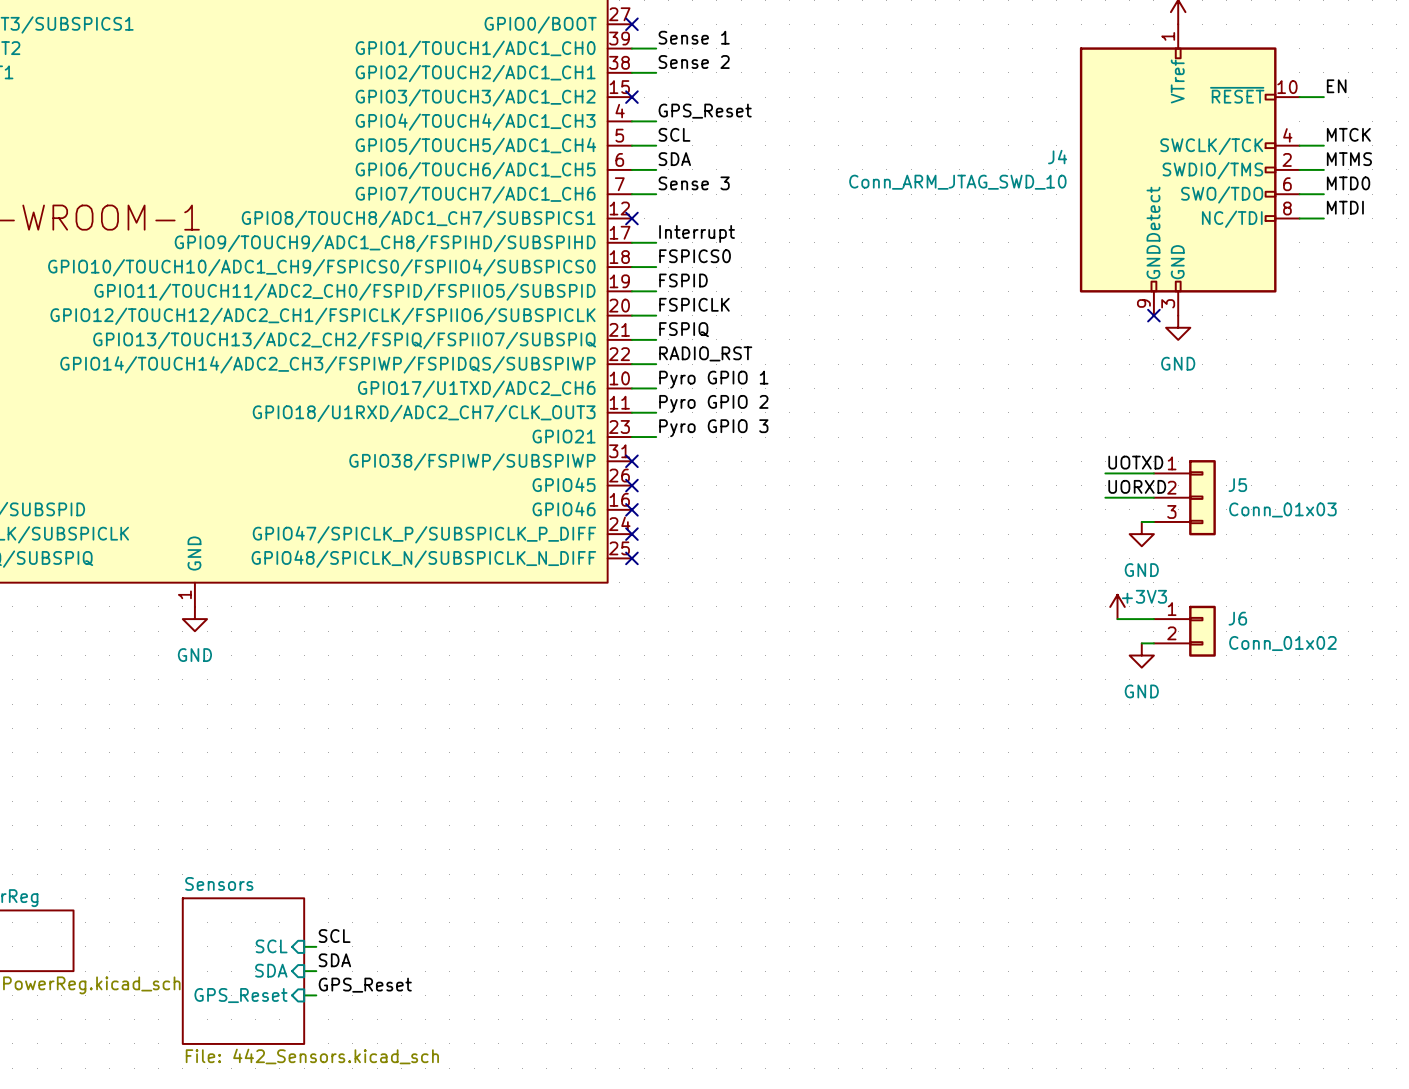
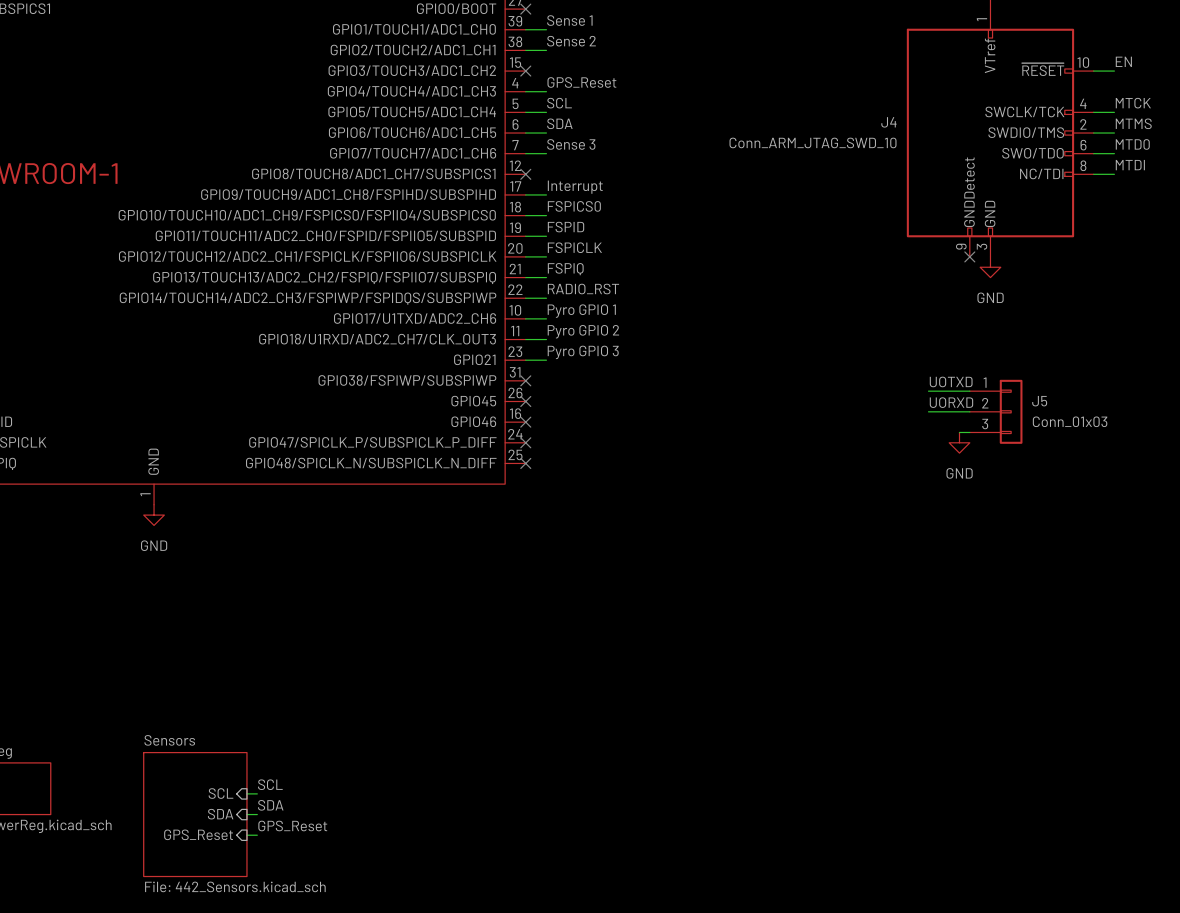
power symbol: +3V3 (1117, 606) -> none
wire: (1117, 619) (1153, 619) -> none
J6: Conn_01x02 (1184, 631) -> none
wire: (1141, 643) (1153, 643) -> none
power symbol: GND (1141, 655) -> none

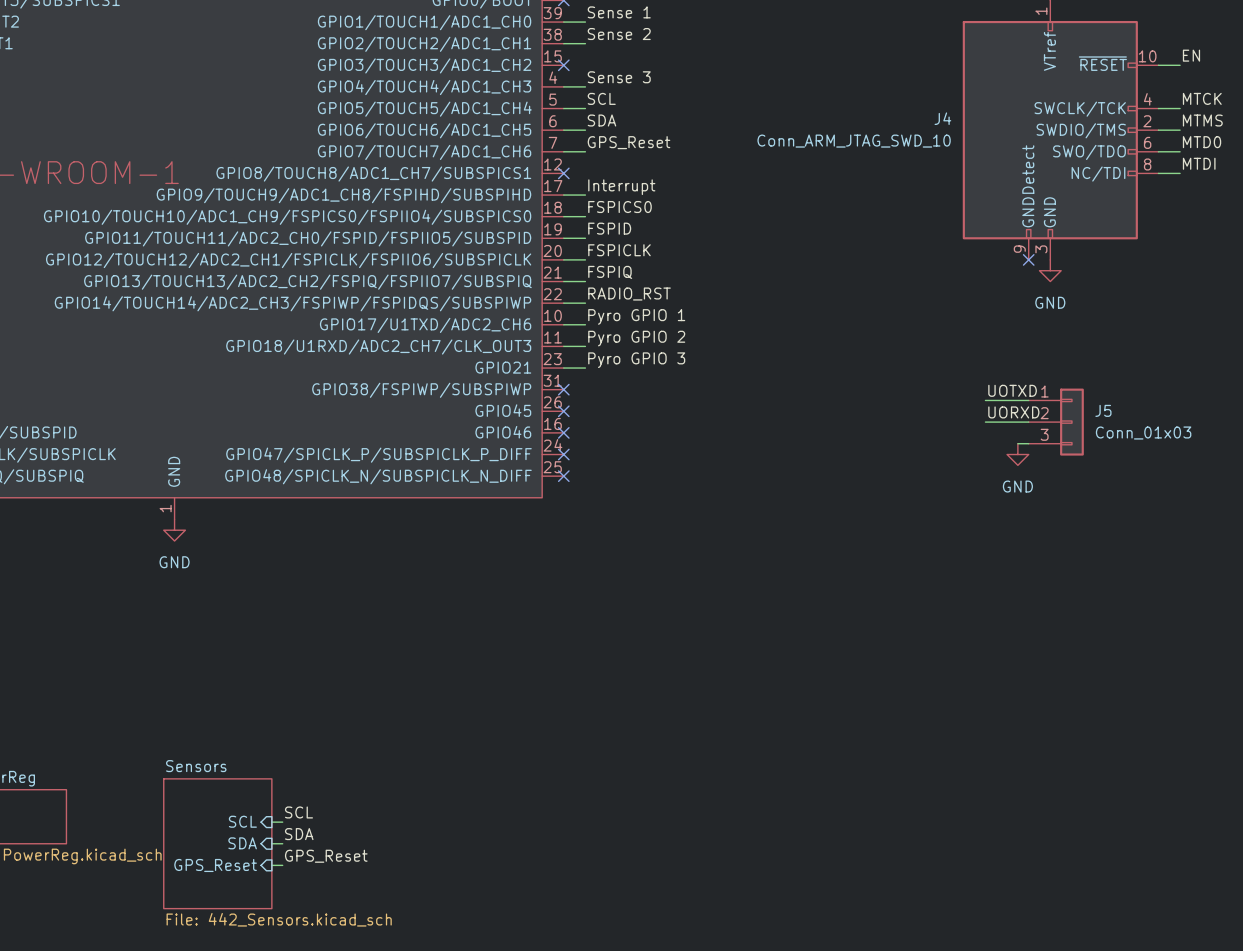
label: GPS_Reset (581, 82) -> Sense 3 (619, 77)
label: Sense 3 (571, 144) -> GPS_Reset (629, 142)

